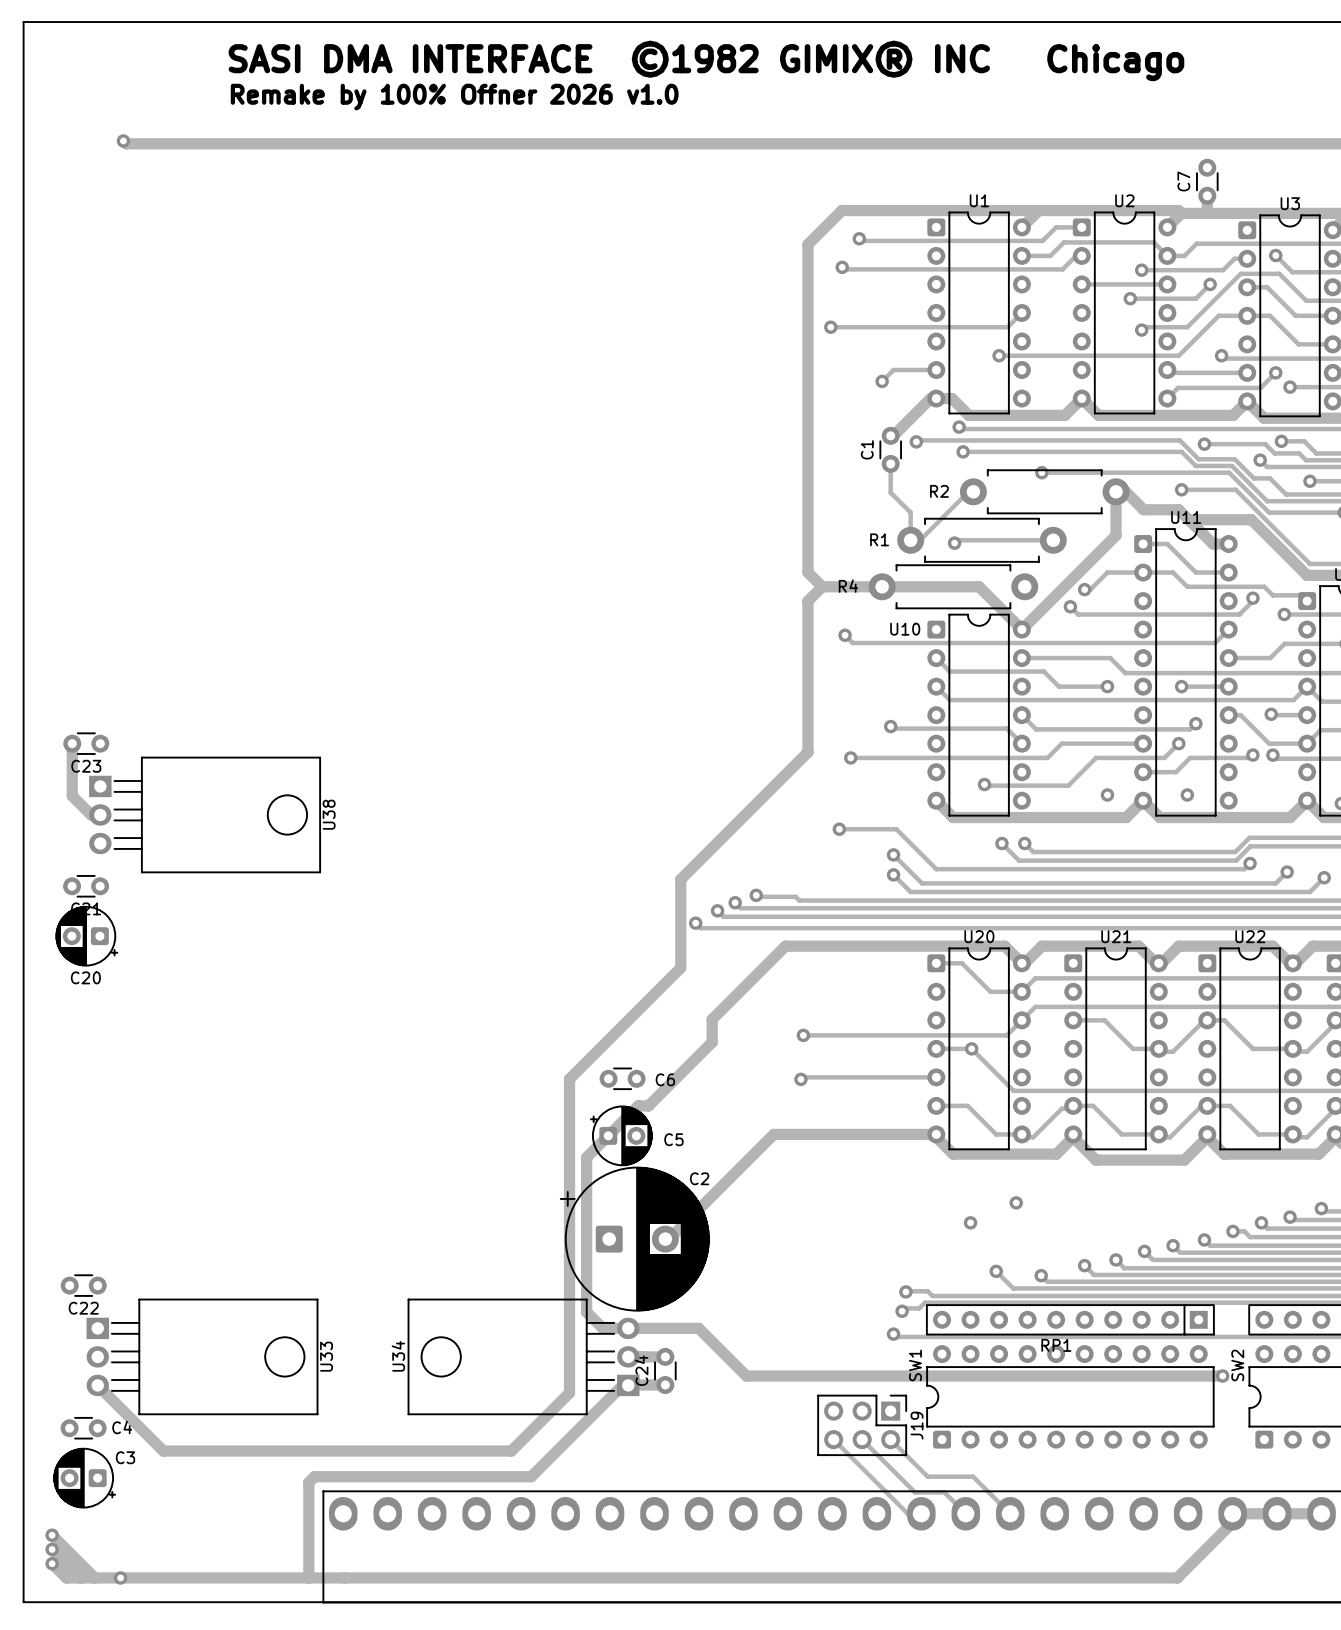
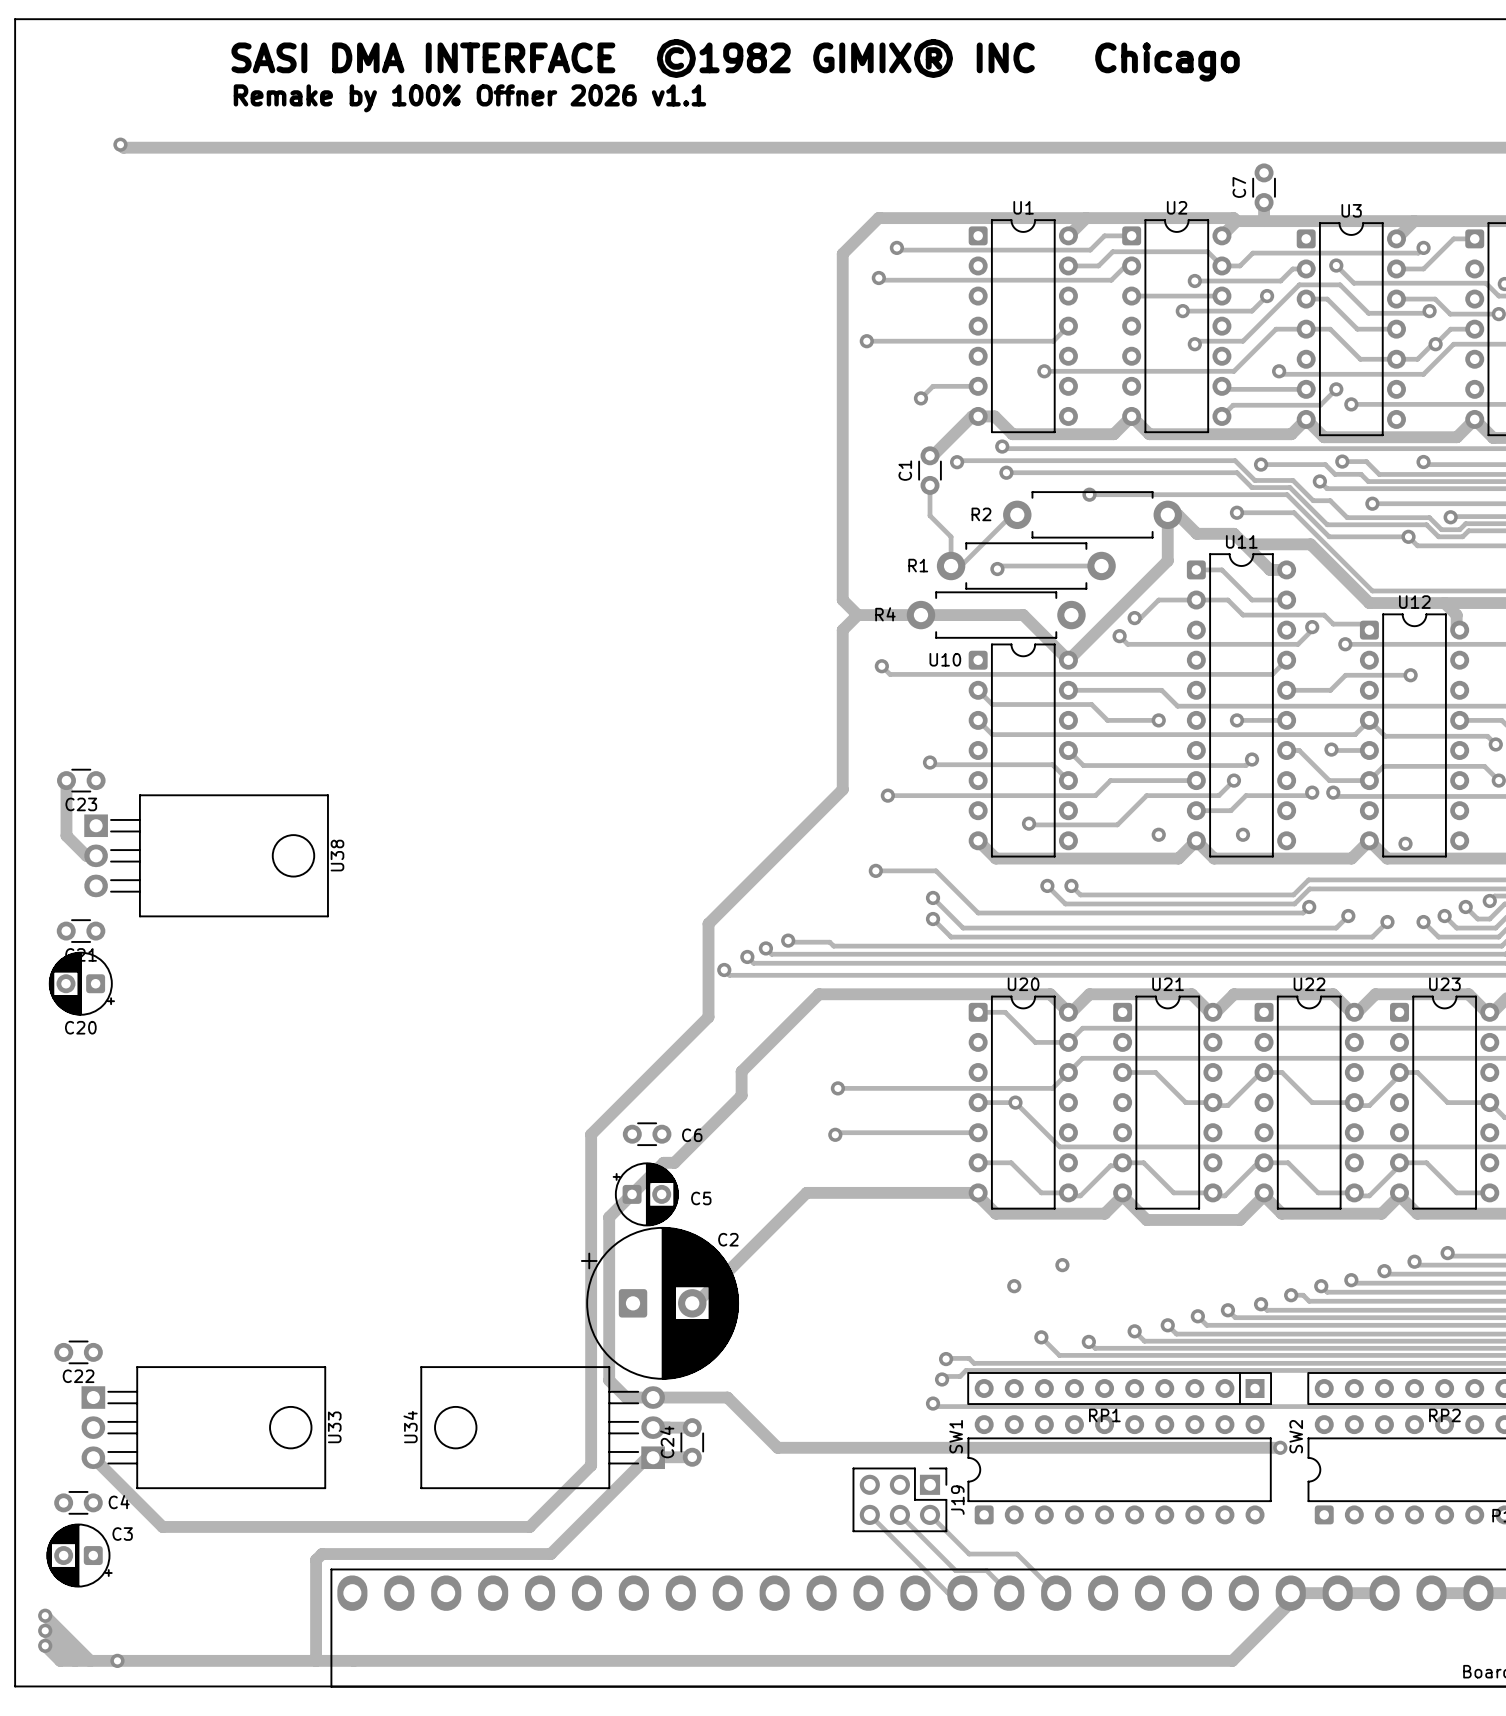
text: Remake by 100% Offner 2026 v1.0 (454, 97) -> Remake by 100% Offner 2026 v1.1 (469, 98)

